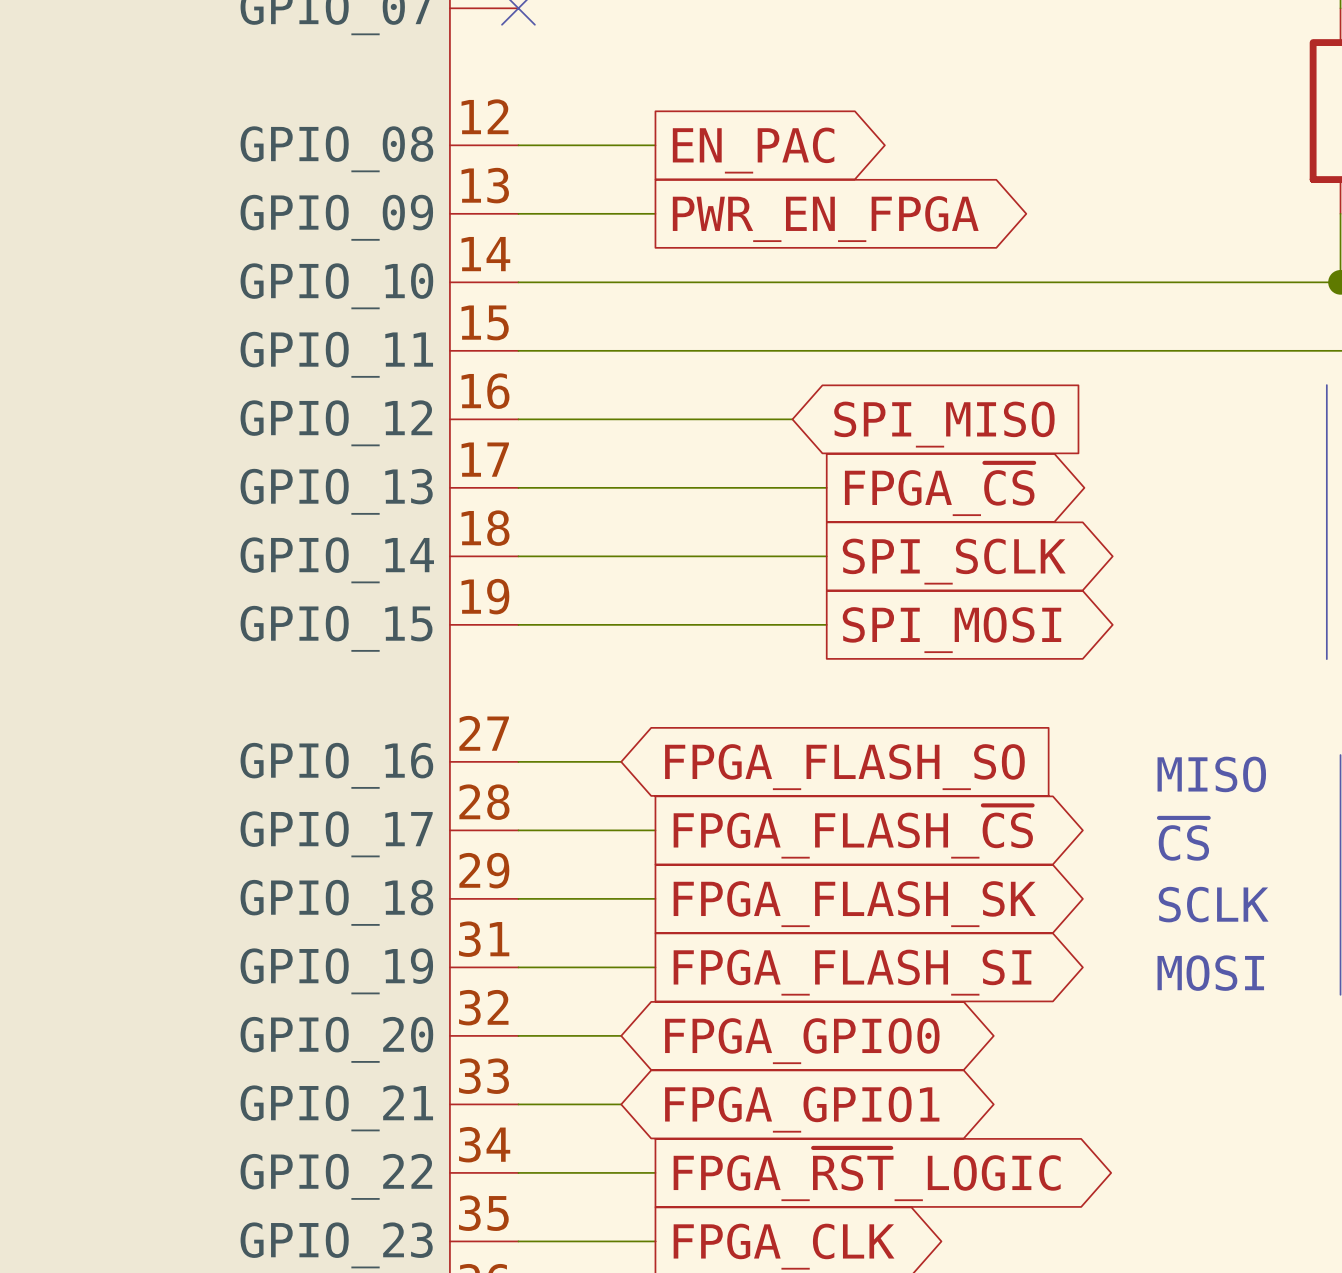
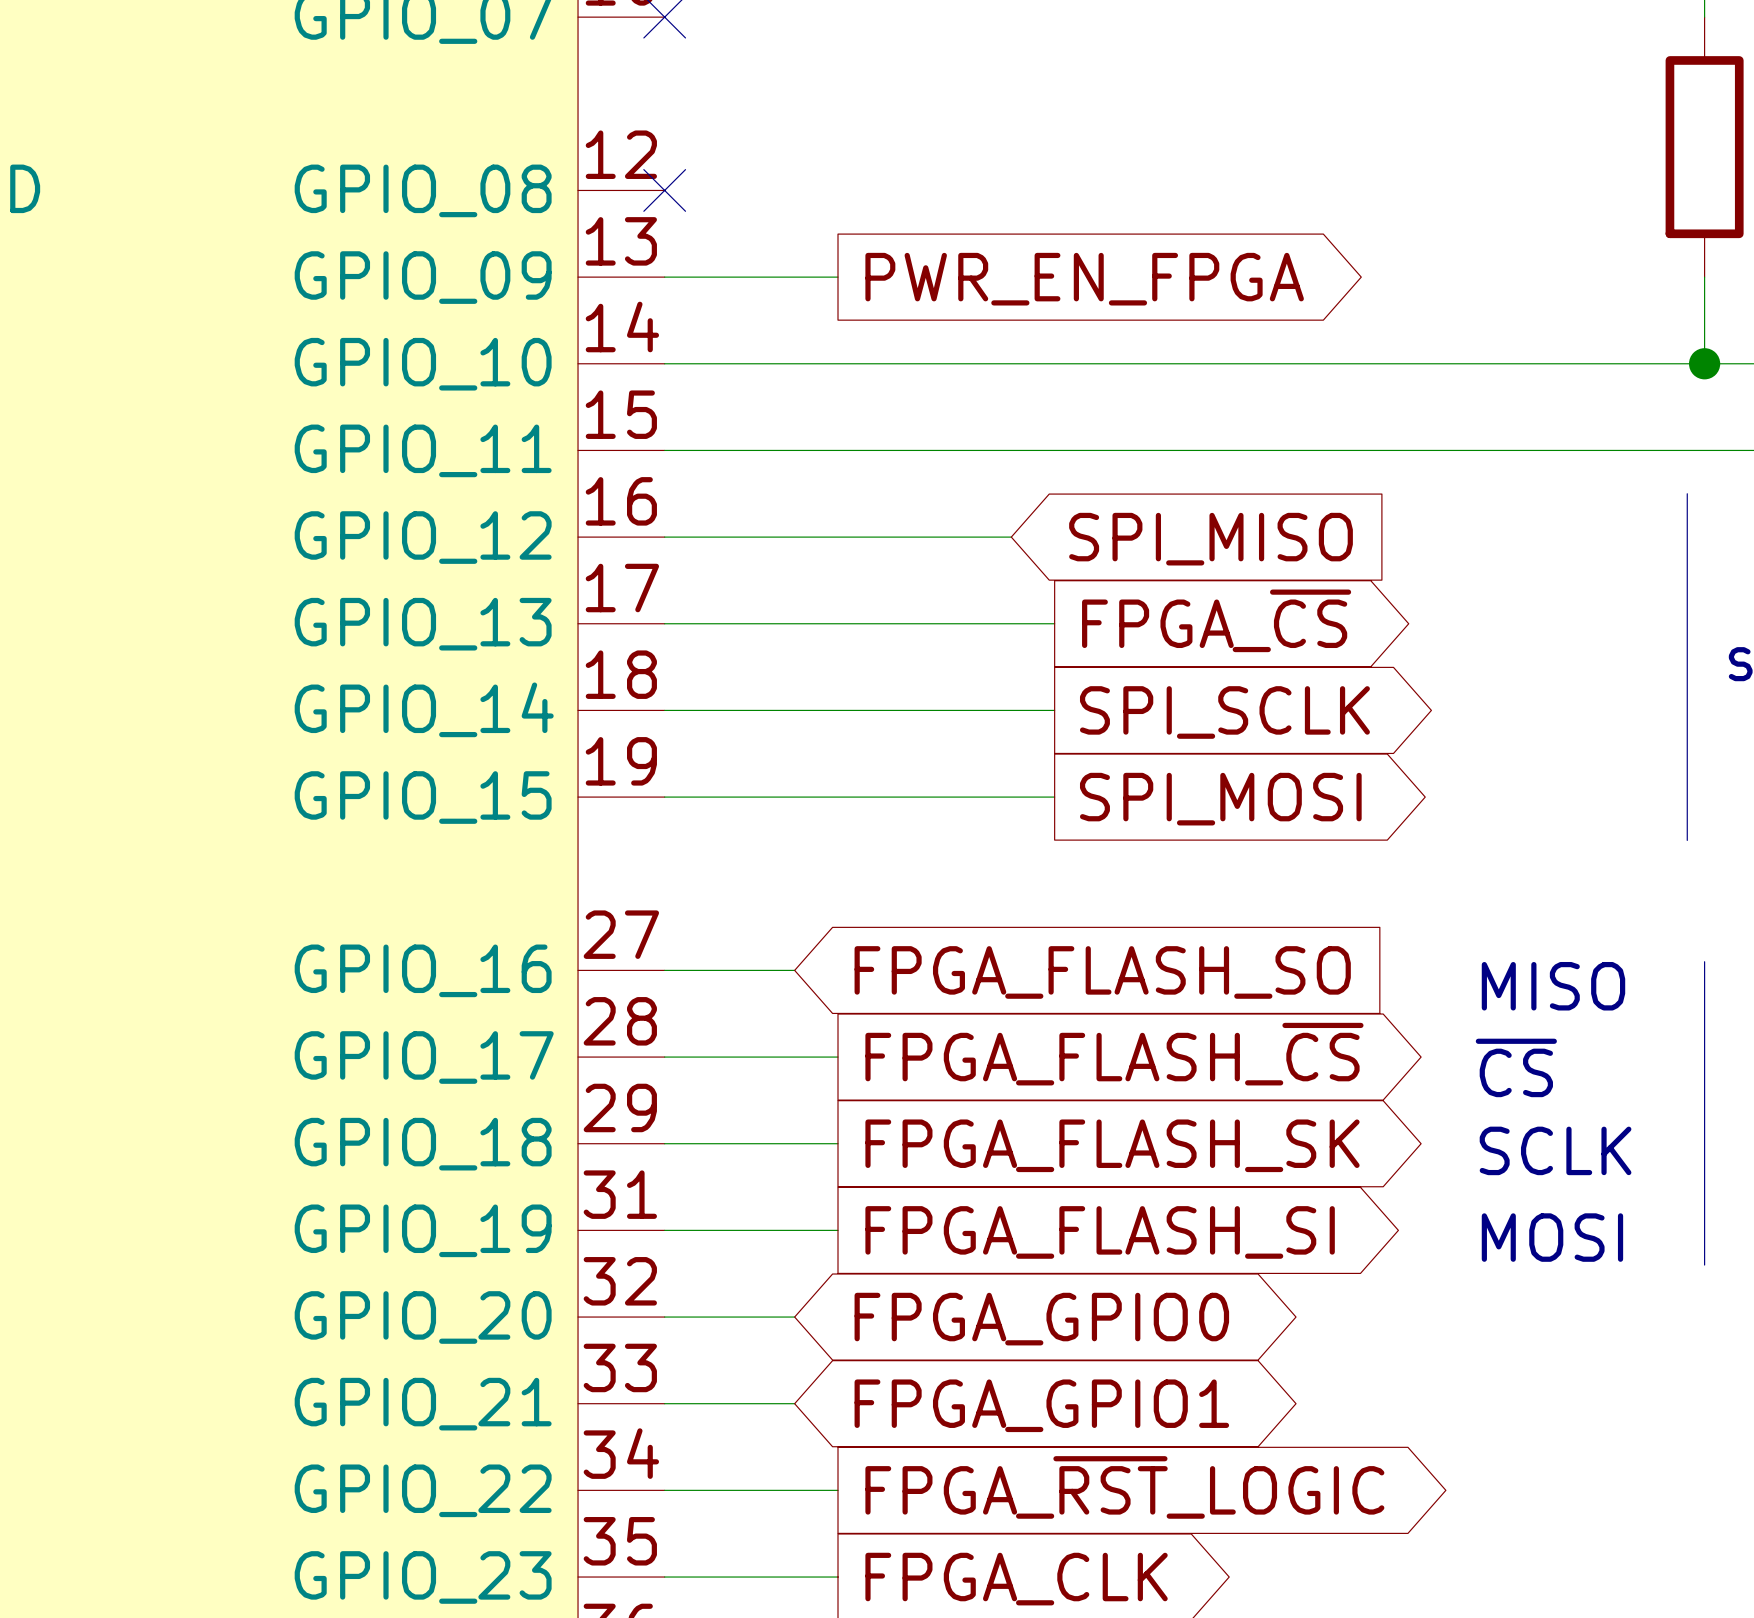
wire: (518, 145) (655, 145) -> none
no-connect mark: none -> (664, 190)
global label: EN_PAC (753, 150) -> none

